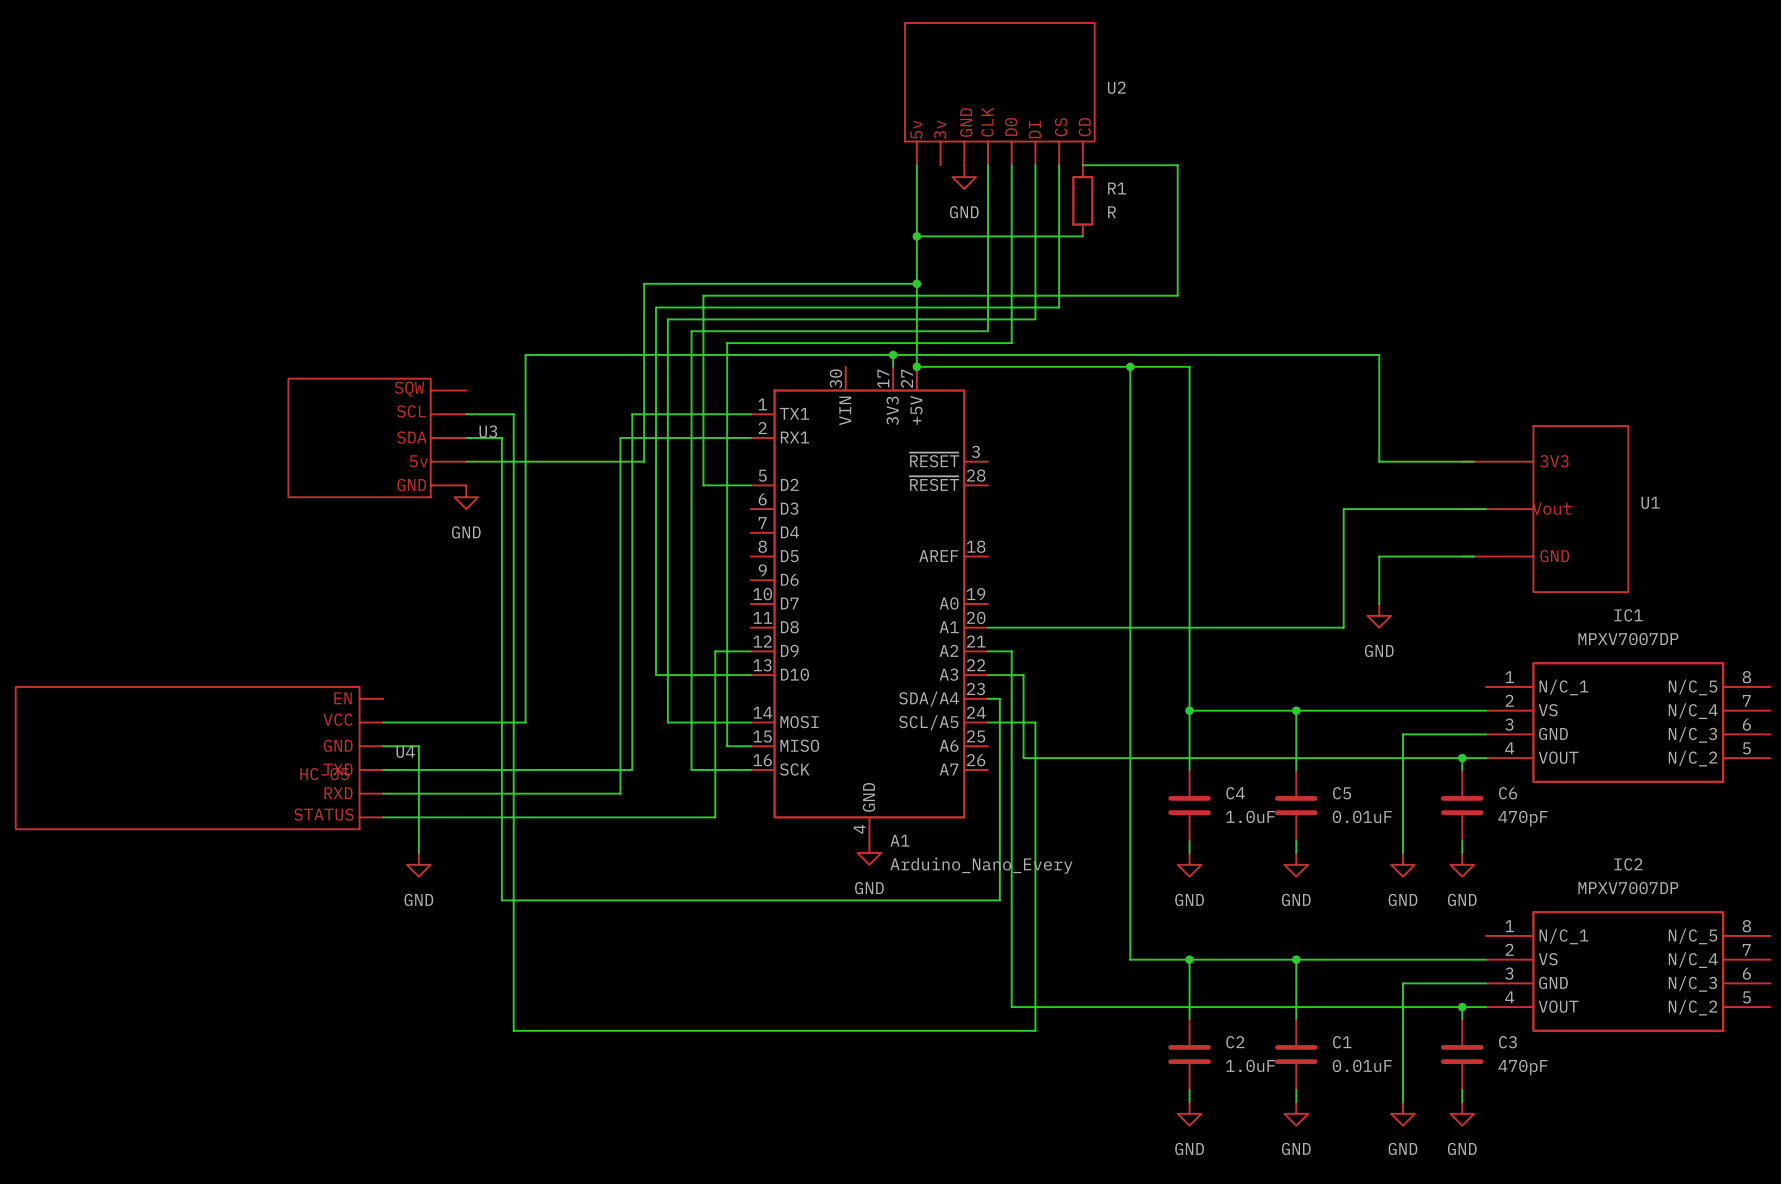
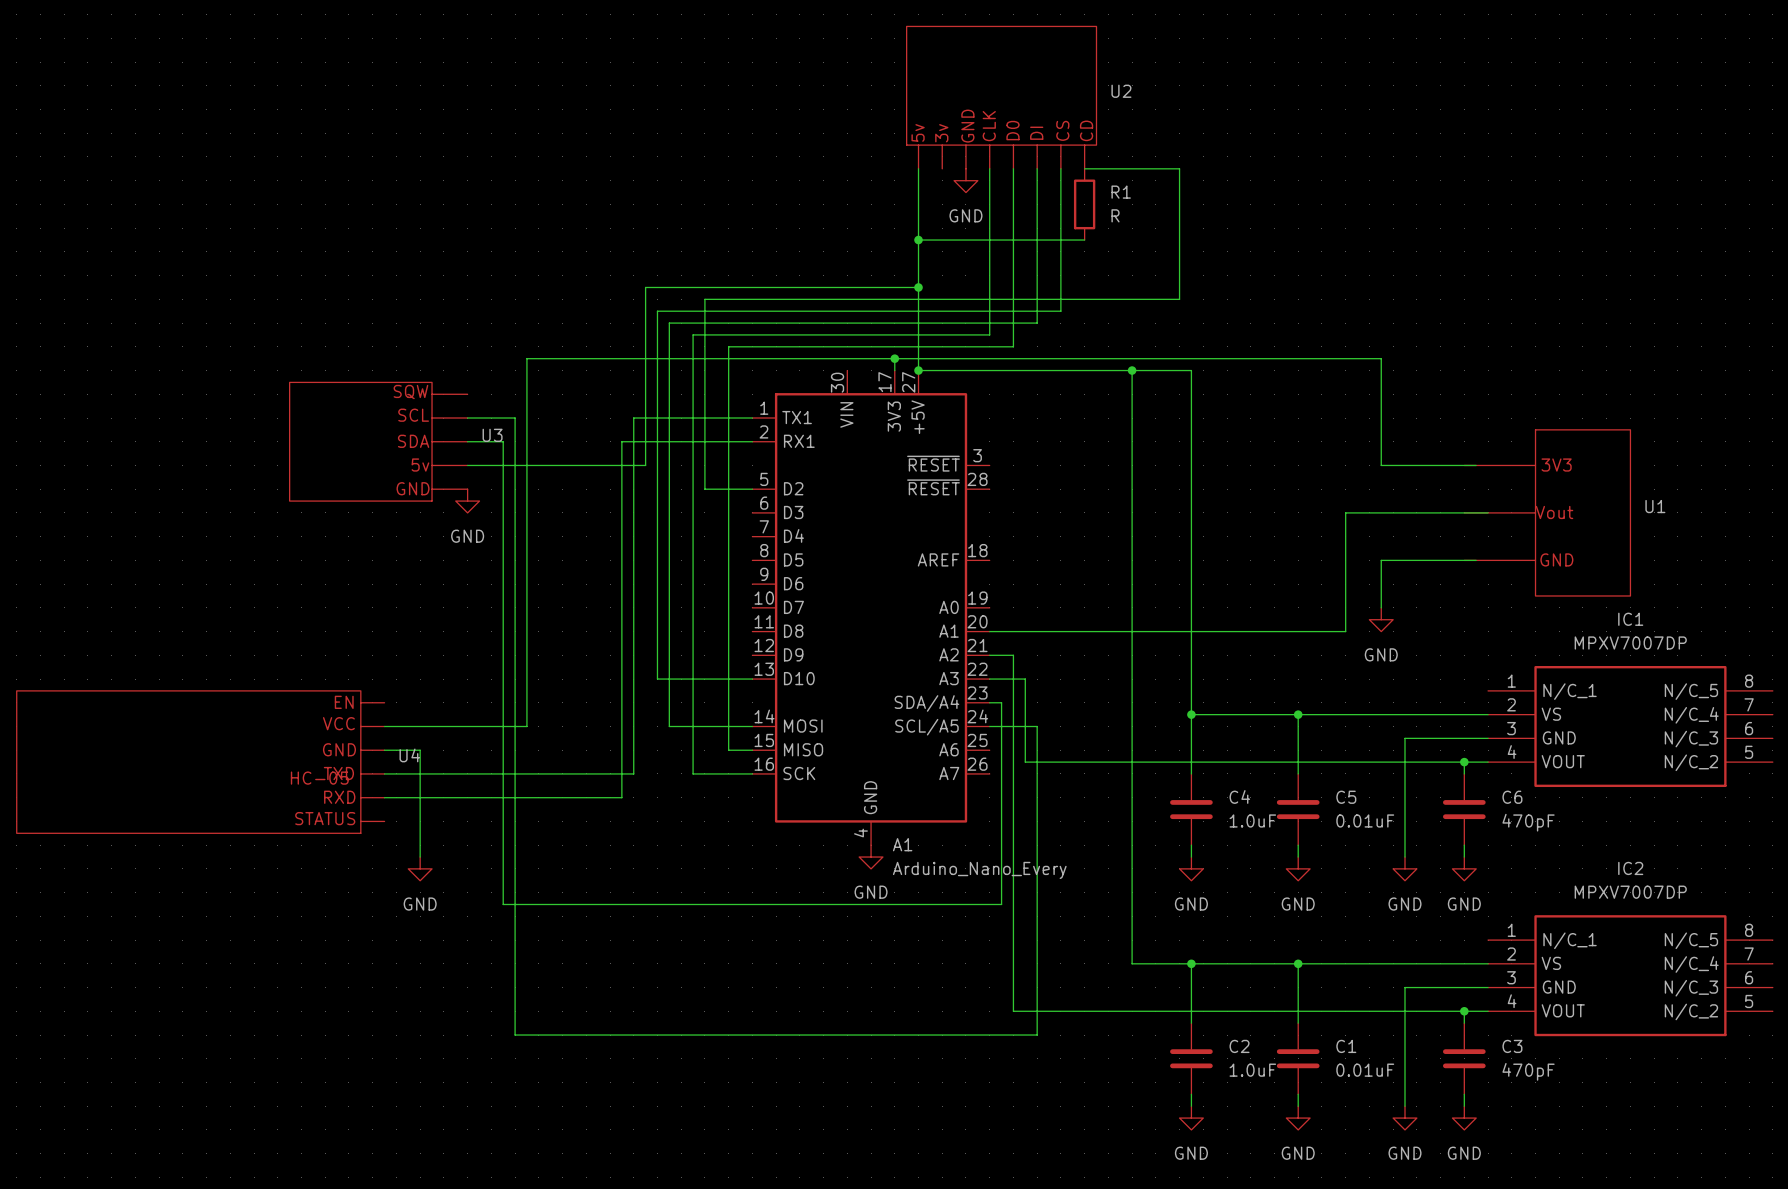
wire: (750, 651) (715, 651) (715, 817) (383, 817) -> none

